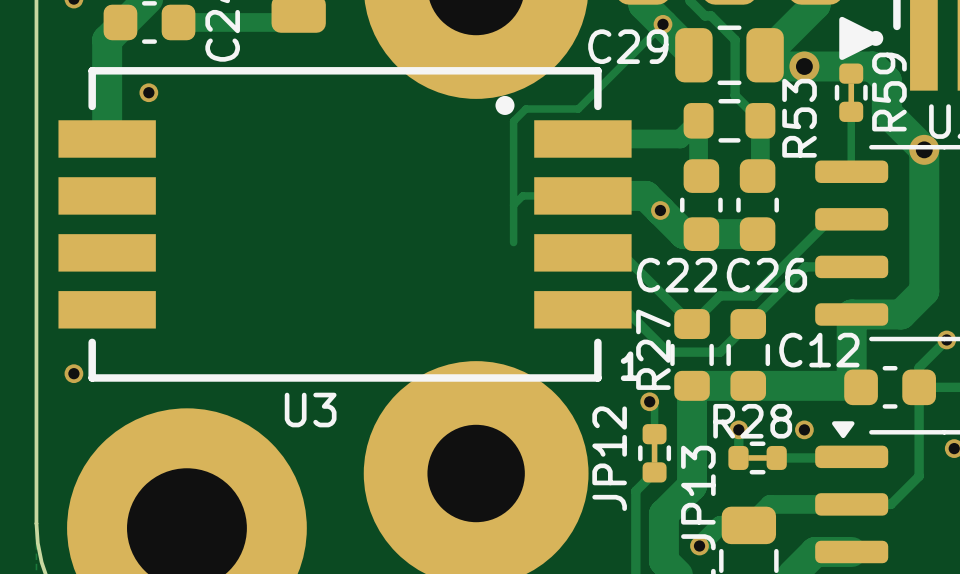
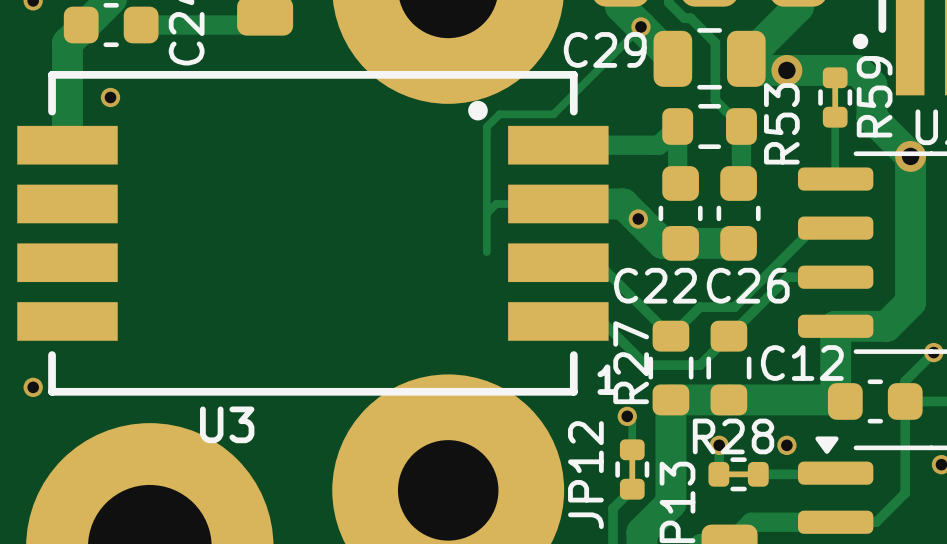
drawing: [839, 16, 883, 60] -> none
U3 name position: U3 (310, 410) -> U3 (227, 424)

